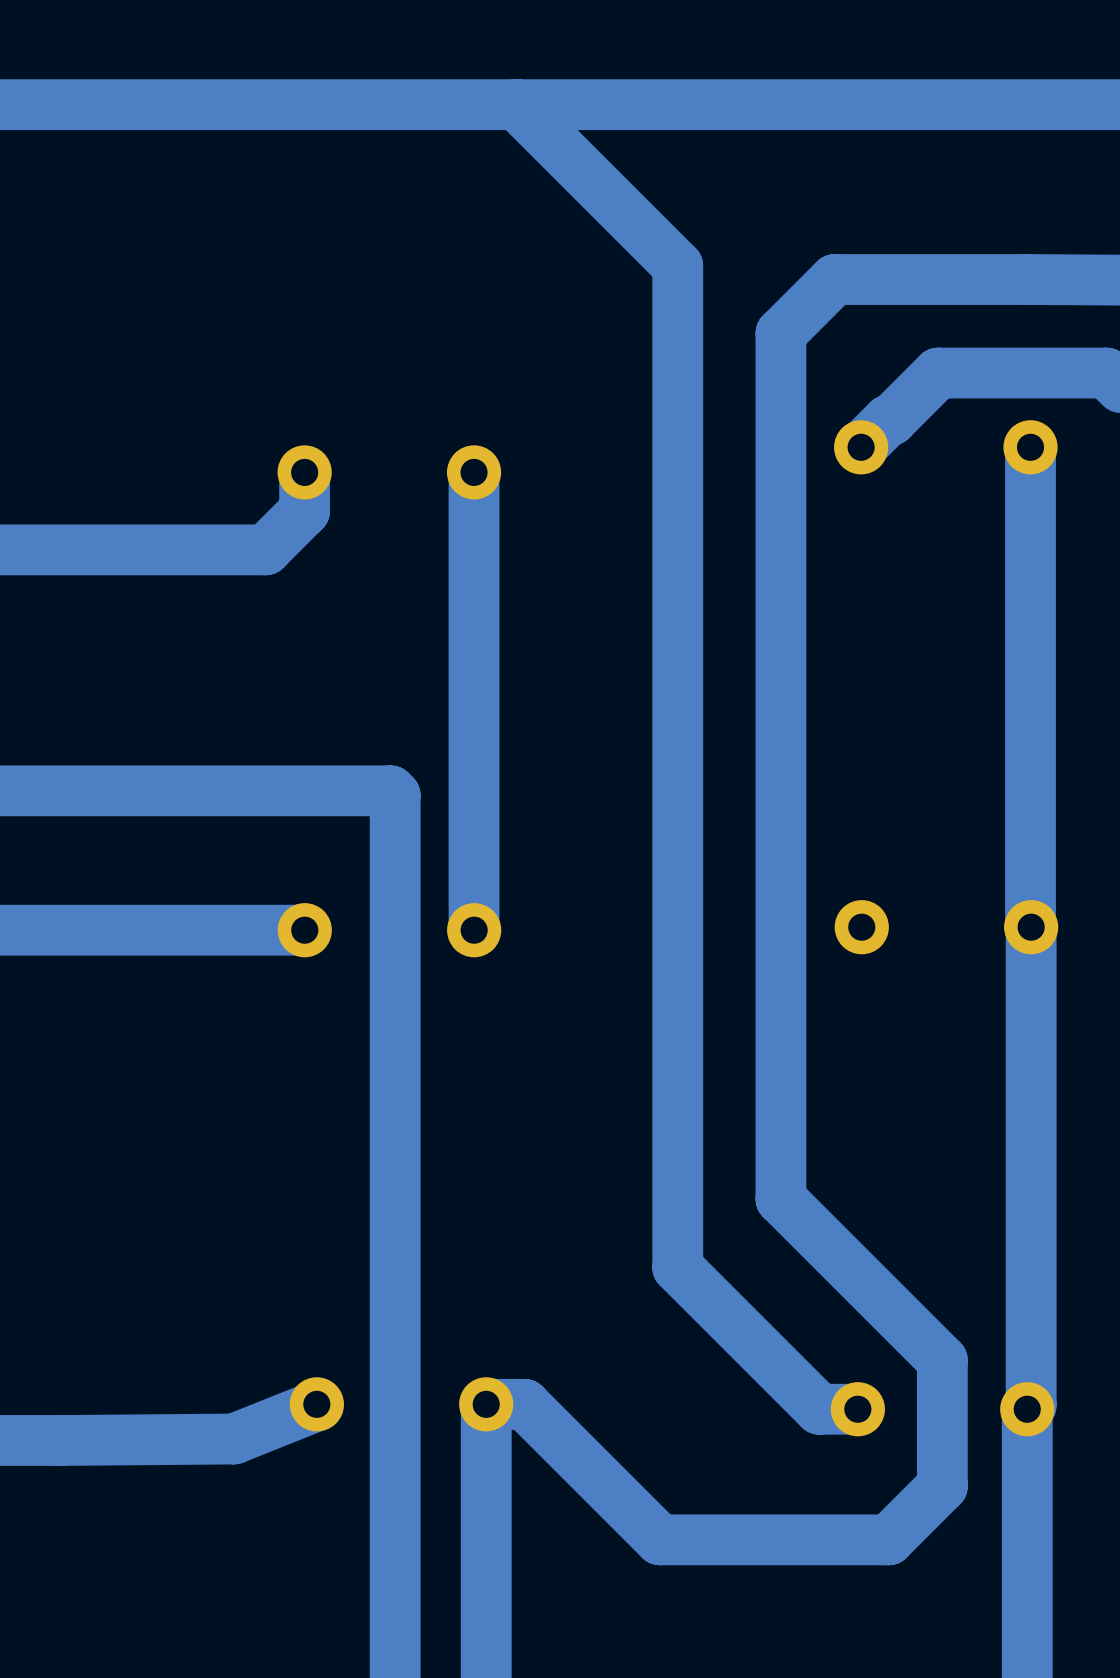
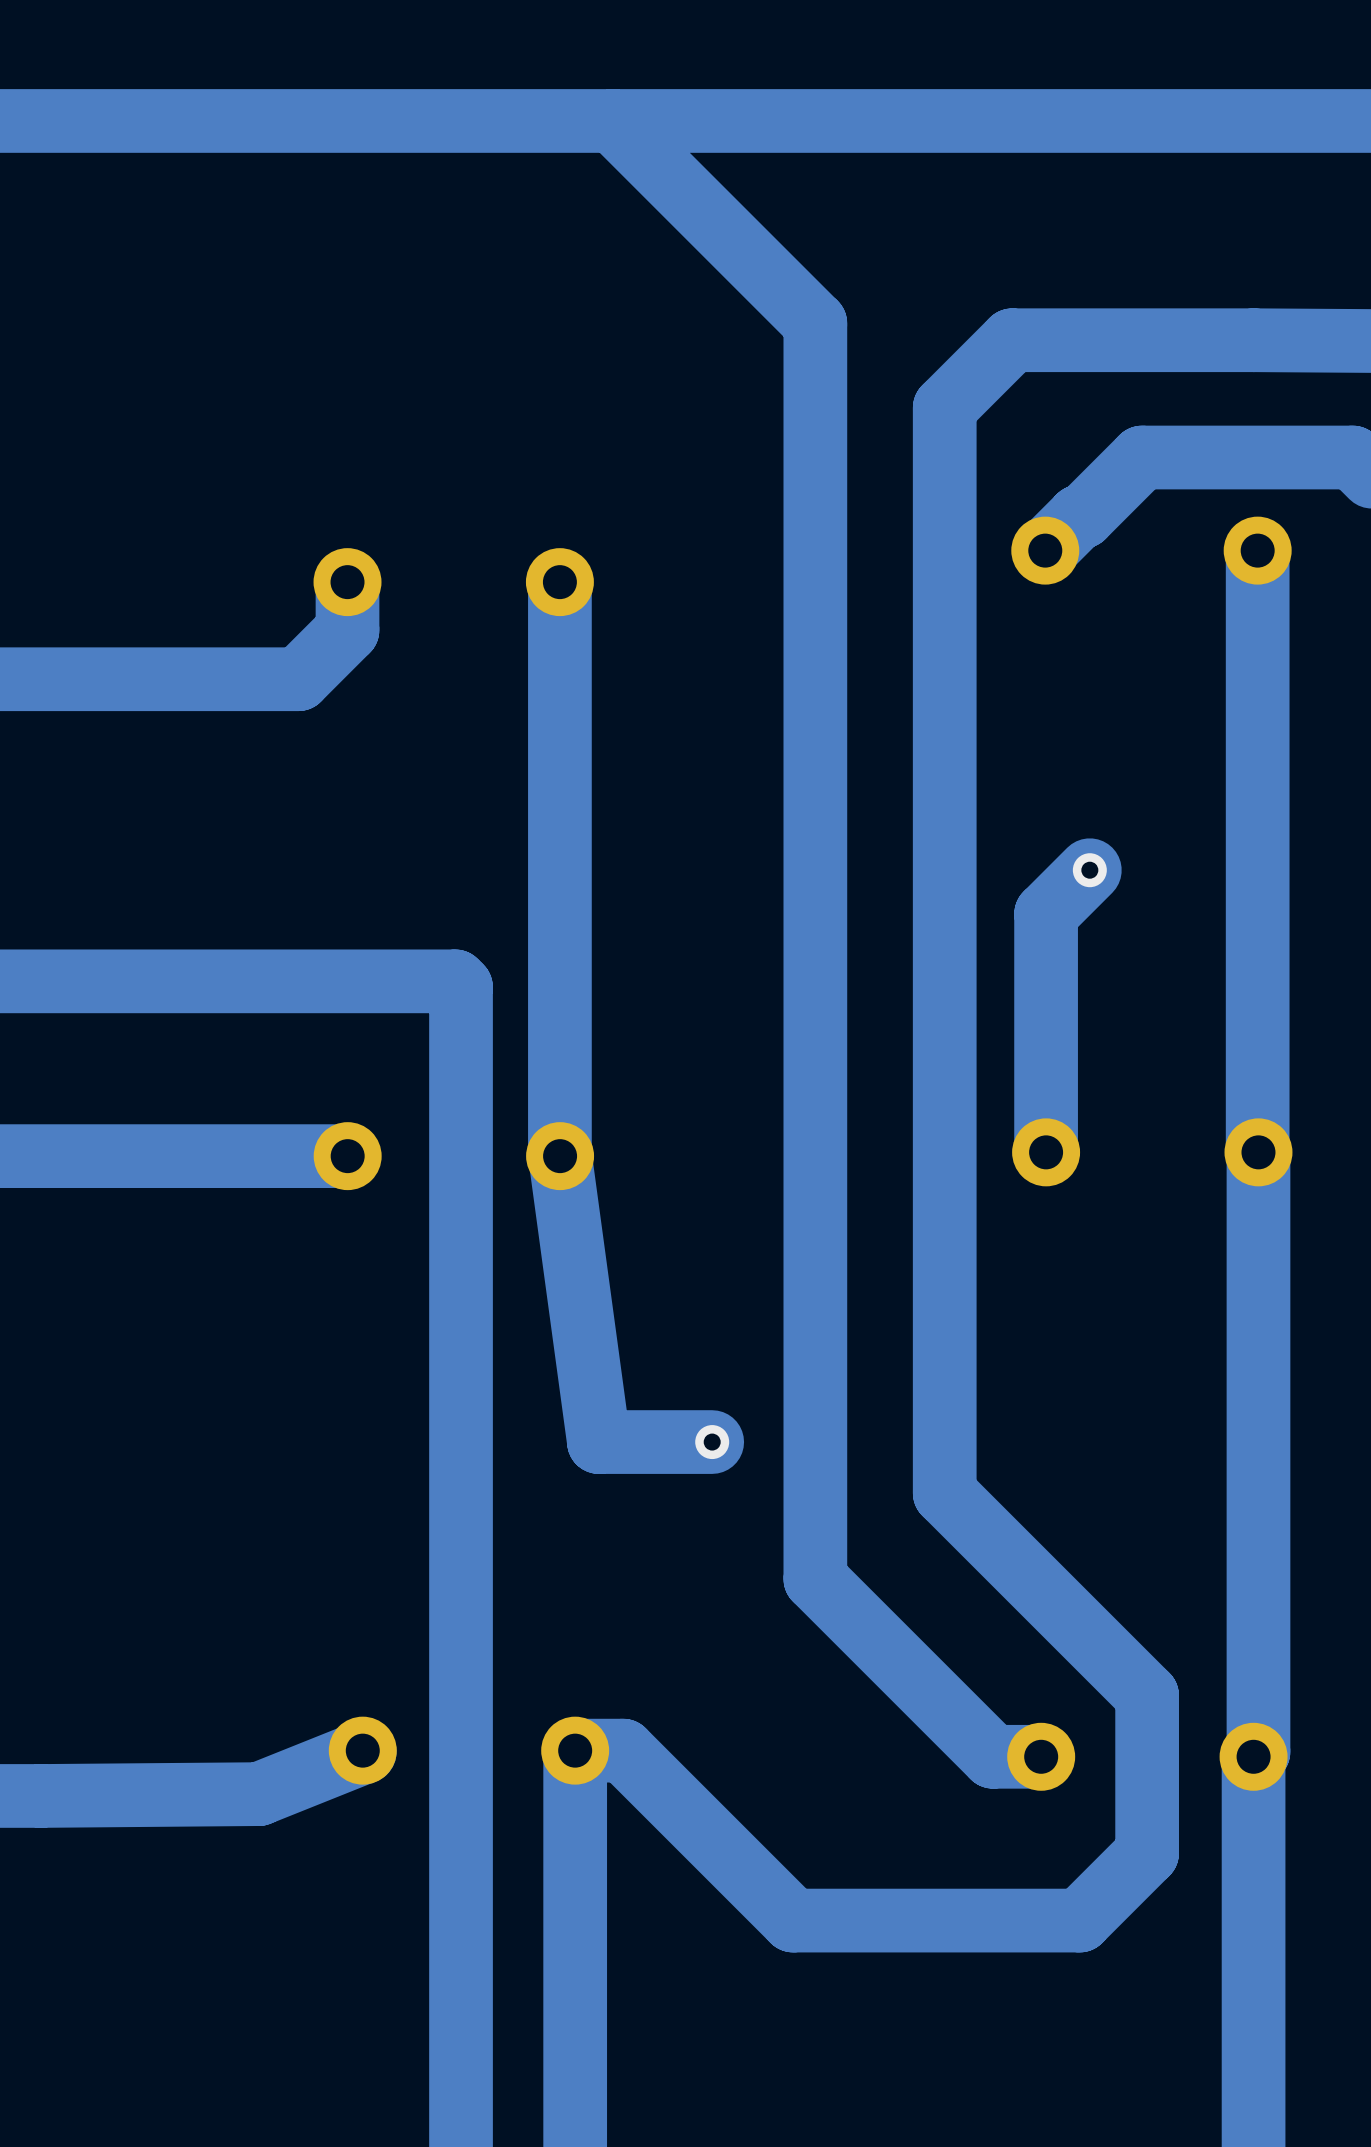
track: none -> (1089, 870) (1046, 913) (1046, 1152)
via: none -> (1089, 870)
track: none -> (560, 1156) (598, 1442) (712, 1442)
via: none -> (712, 1442)

